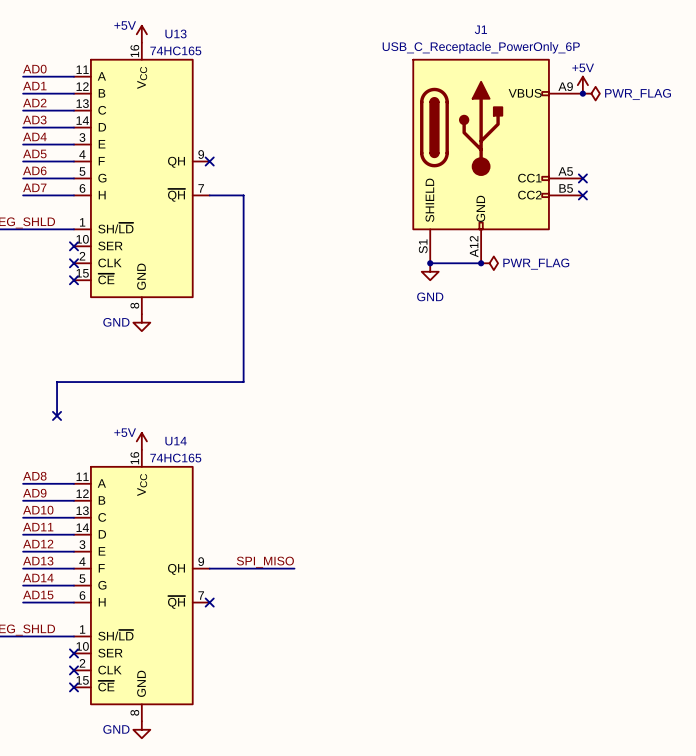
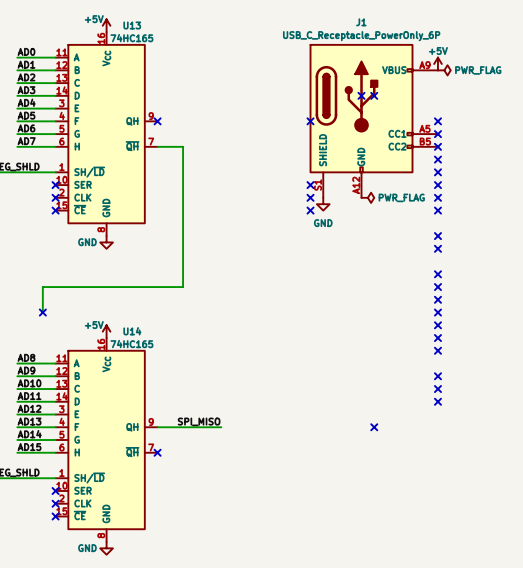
junction: (582, 93) -> none
no-connect mark: none -> (361, 95)
no-connect mark: none -> (374, 95)
no-connect mark: none -> (310, 121)
no-connect mark: none -> (437, 121)
no-connect mark: none -> (437, 159)
no-connect mark: none -> (437, 172)
no-connect mark: none -> (310, 185)
no-connect mark: none -> (437, 185)
no-connect mark: none -> (310, 197)
wire: (430, 263) (481, 263) -> none
junction: (430, 263) -> none
junction: (481, 263) -> none
no-connect mark: none -> (437, 197)
no-connect mark: none -> (310, 210)
no-connect mark: none -> (437, 210)
no-connect mark: none -> (437, 236)
no-connect mark: none -> (437, 248)
no-connect mark: none -> (437, 274)
no-connect mark: none -> (437, 287)
no-connect mark: none -> (437, 299)
no-connect mark: none -> (437, 312)
no-connect mark: none -> (437, 325)
no-connect mark: none -> (437, 338)
no-connect mark: none -> (437, 350)
no-connect mark: none -> (437, 376)
no-connect mark: none -> (437, 389)
no-connect mark: none -> (437, 401)
no-connect mark: none -> (374, 427)

